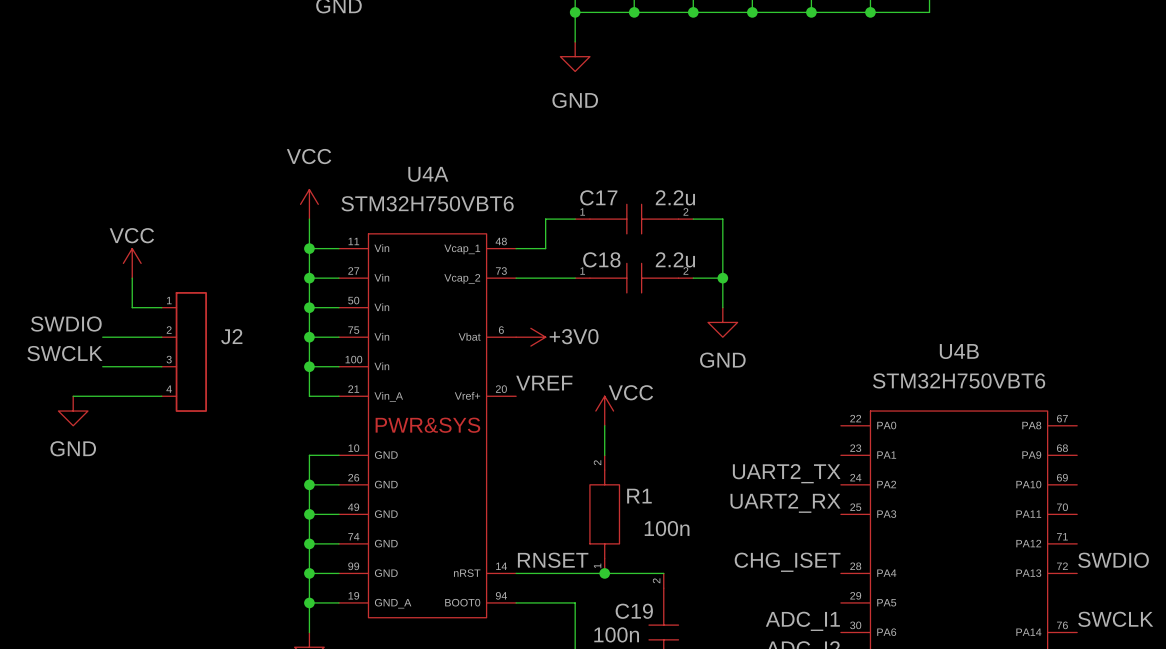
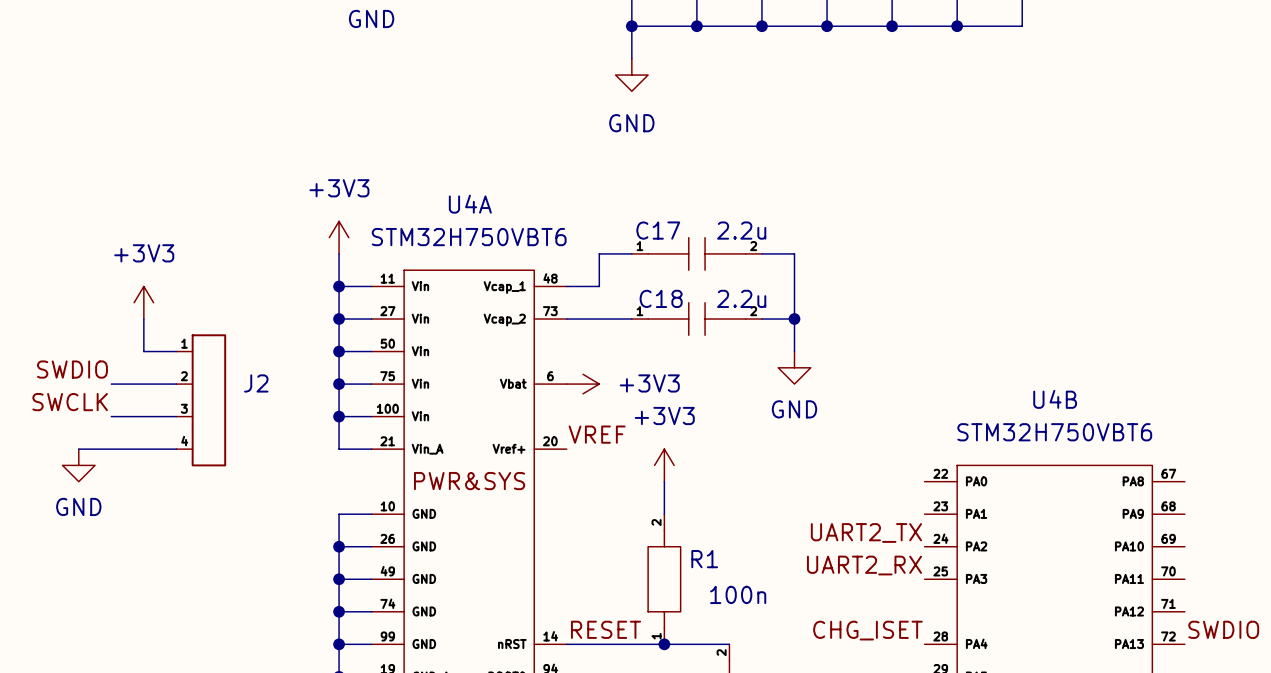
power symbol: VCC (309, 204) -> +3V3 (339, 237)
power symbol: VCC (132, 263) -> +3V3 (143, 302)
power symbol: +3V0 (530, 337) -> +3V3 (583, 384)
power symbol: VCC (604, 411) -> +3V3 (664, 465)
label: RNSET (553, 560) -> RESET (606, 629)

